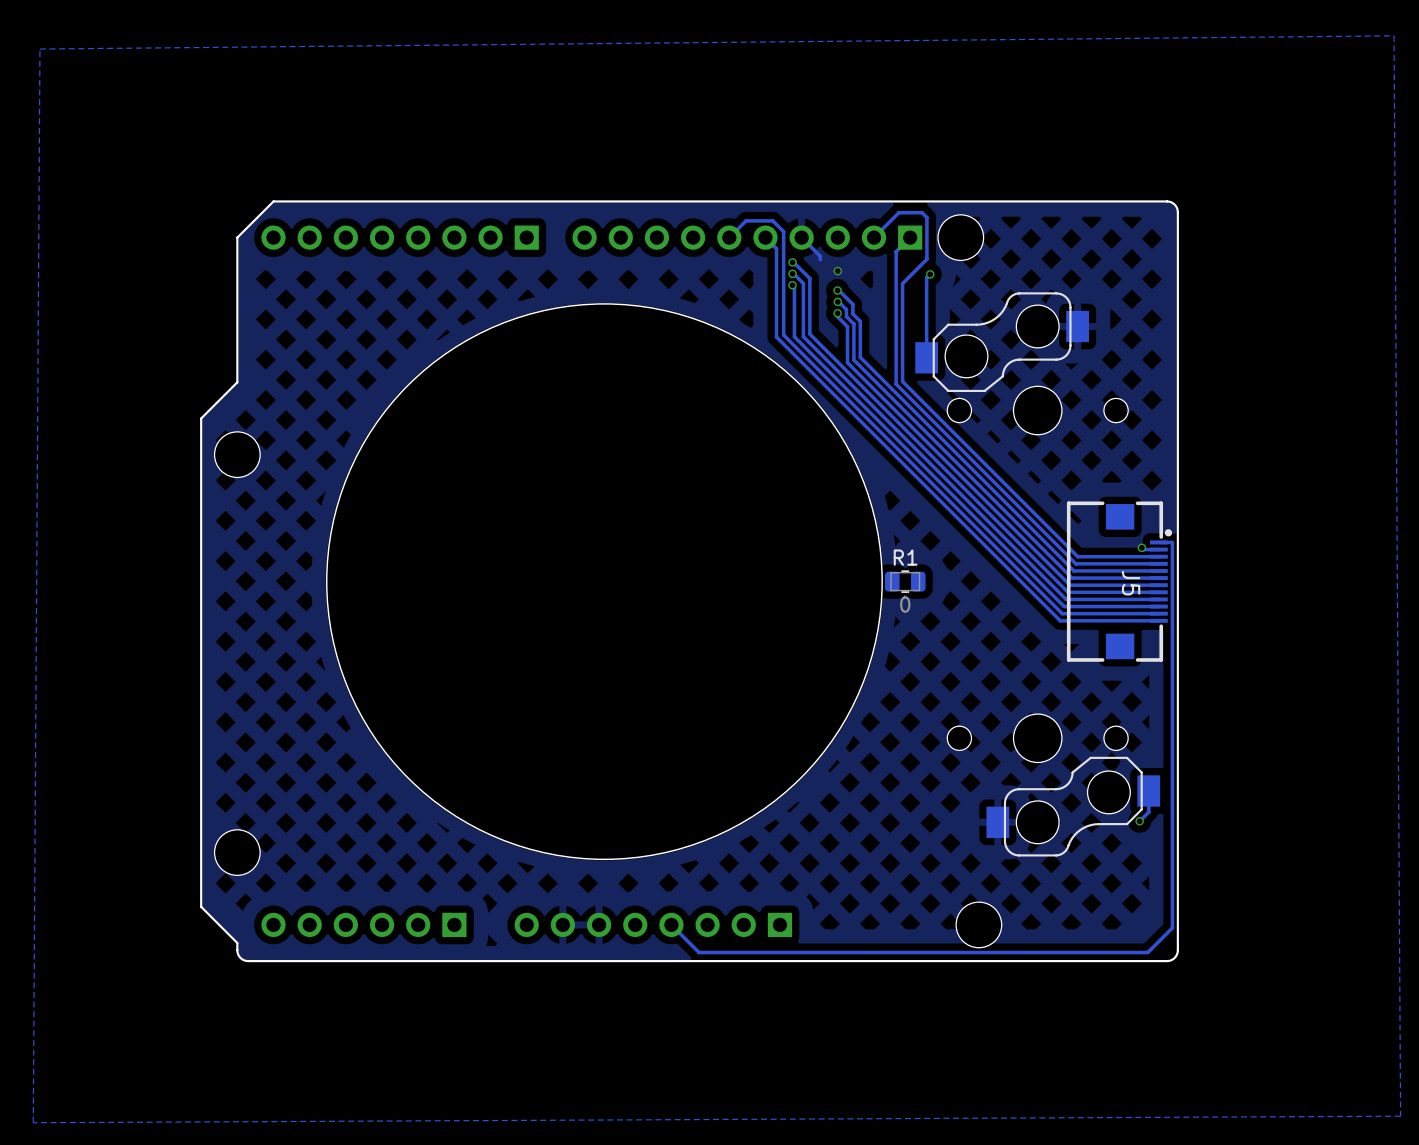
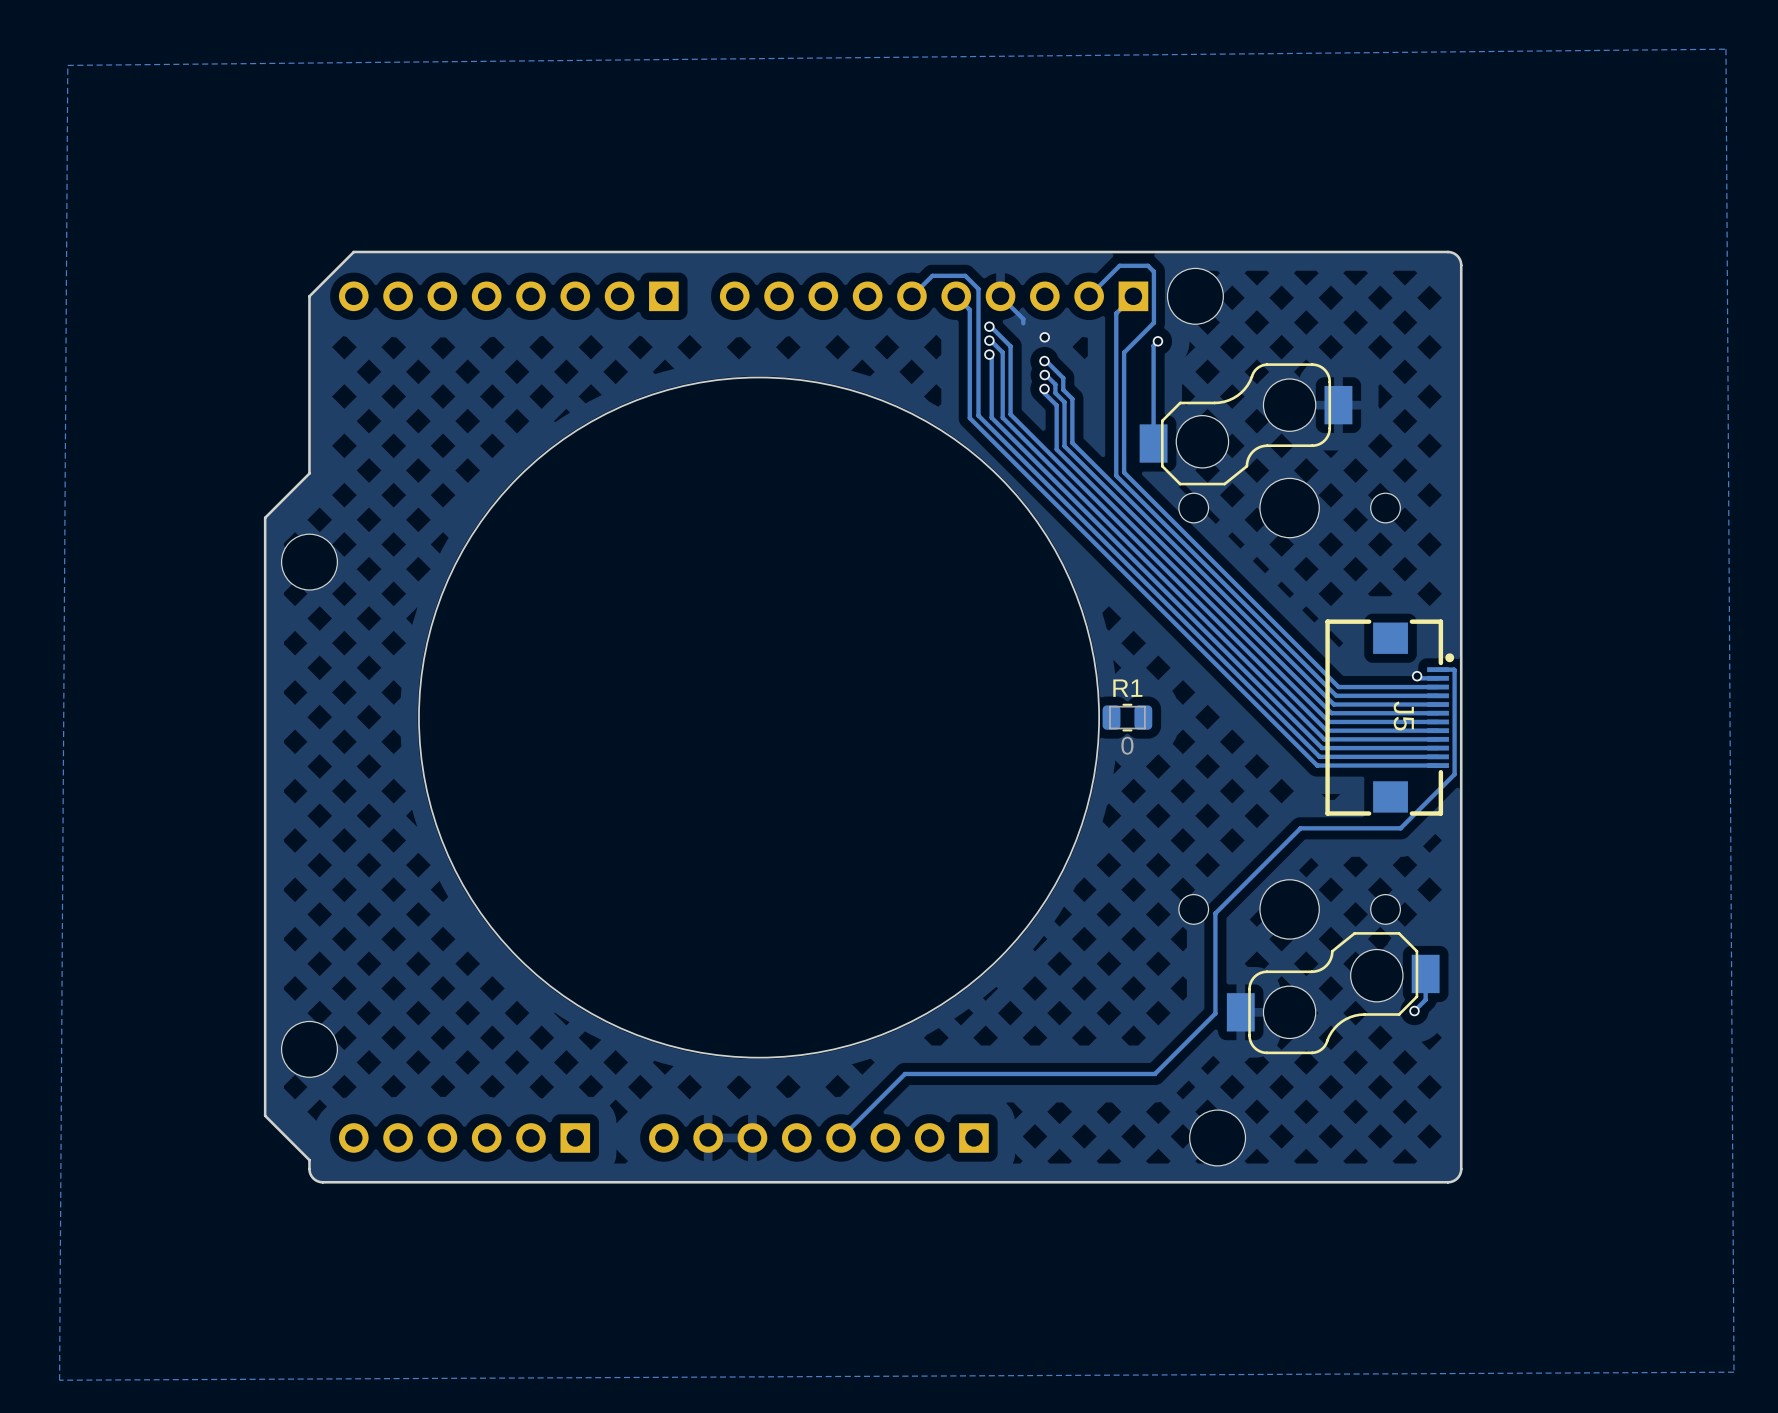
track: (1172, 627) (1172, 927) (1147, 952) (699, 952) (671, 924) -> (1454, 774) (1400, 828) (1300, 828) (1215, 913) (1215, 1013) (1154, 1073) (905, 1073) (841, 1137)

